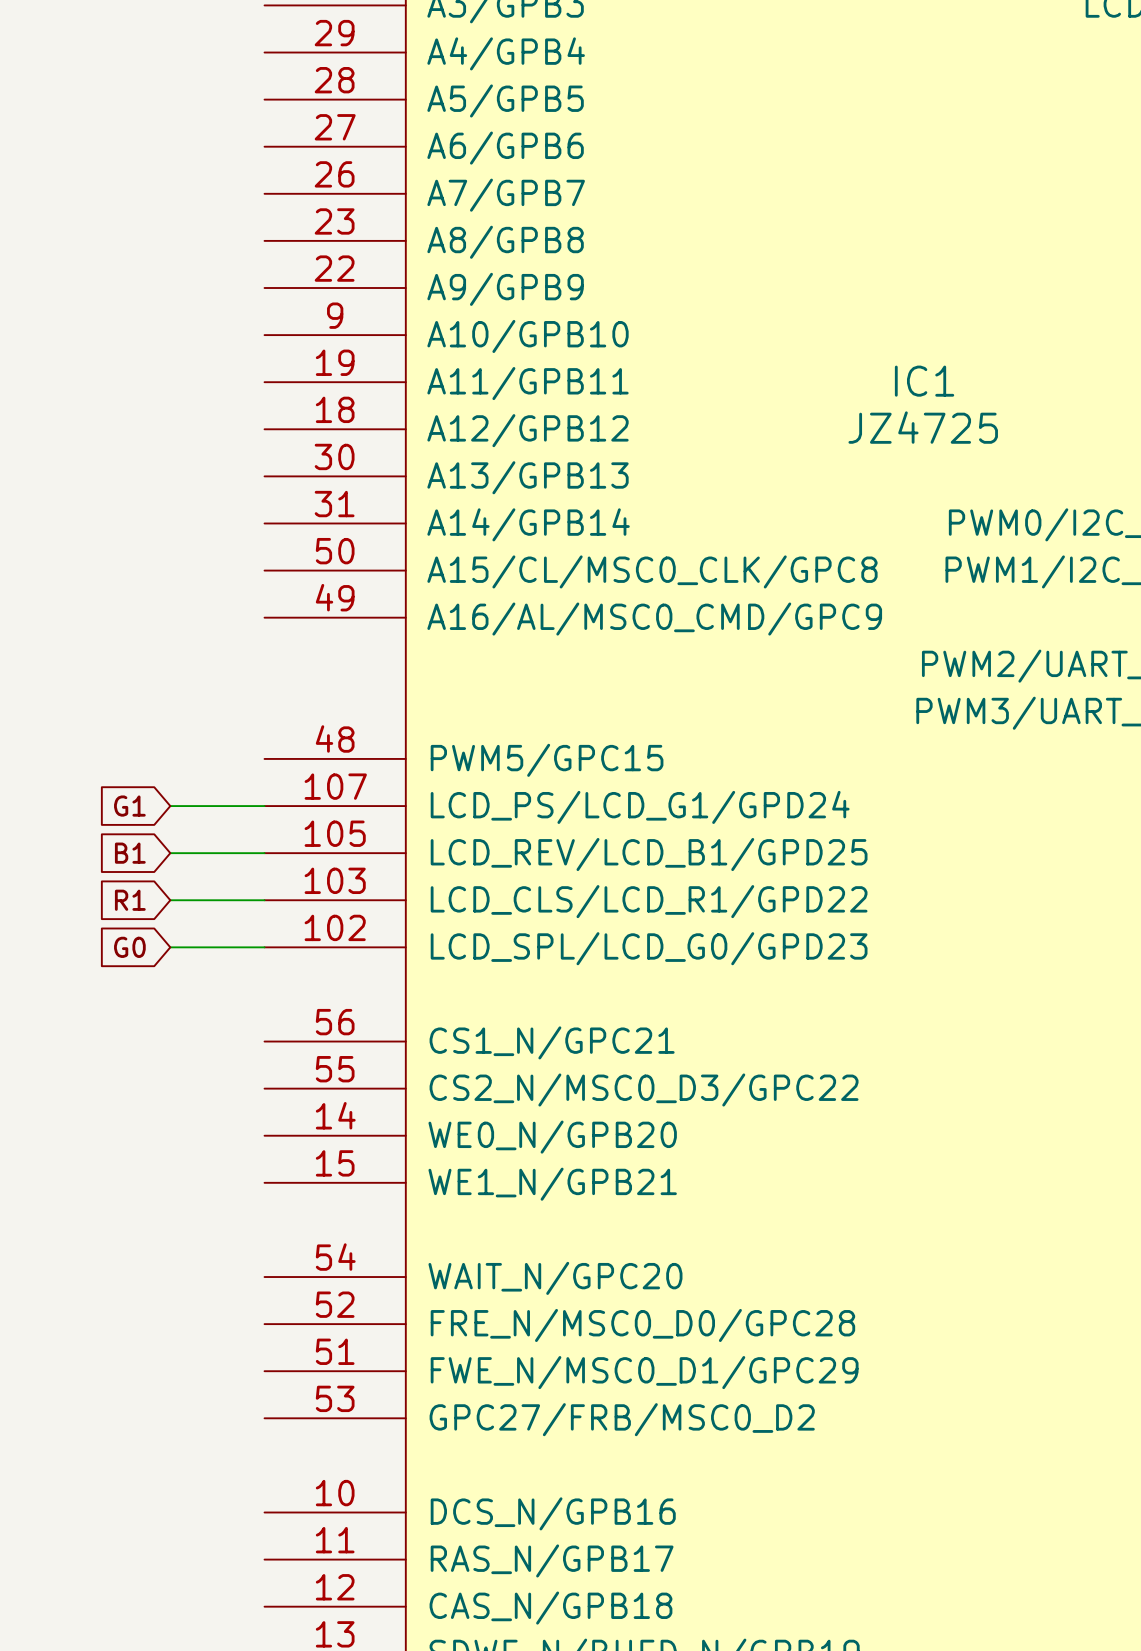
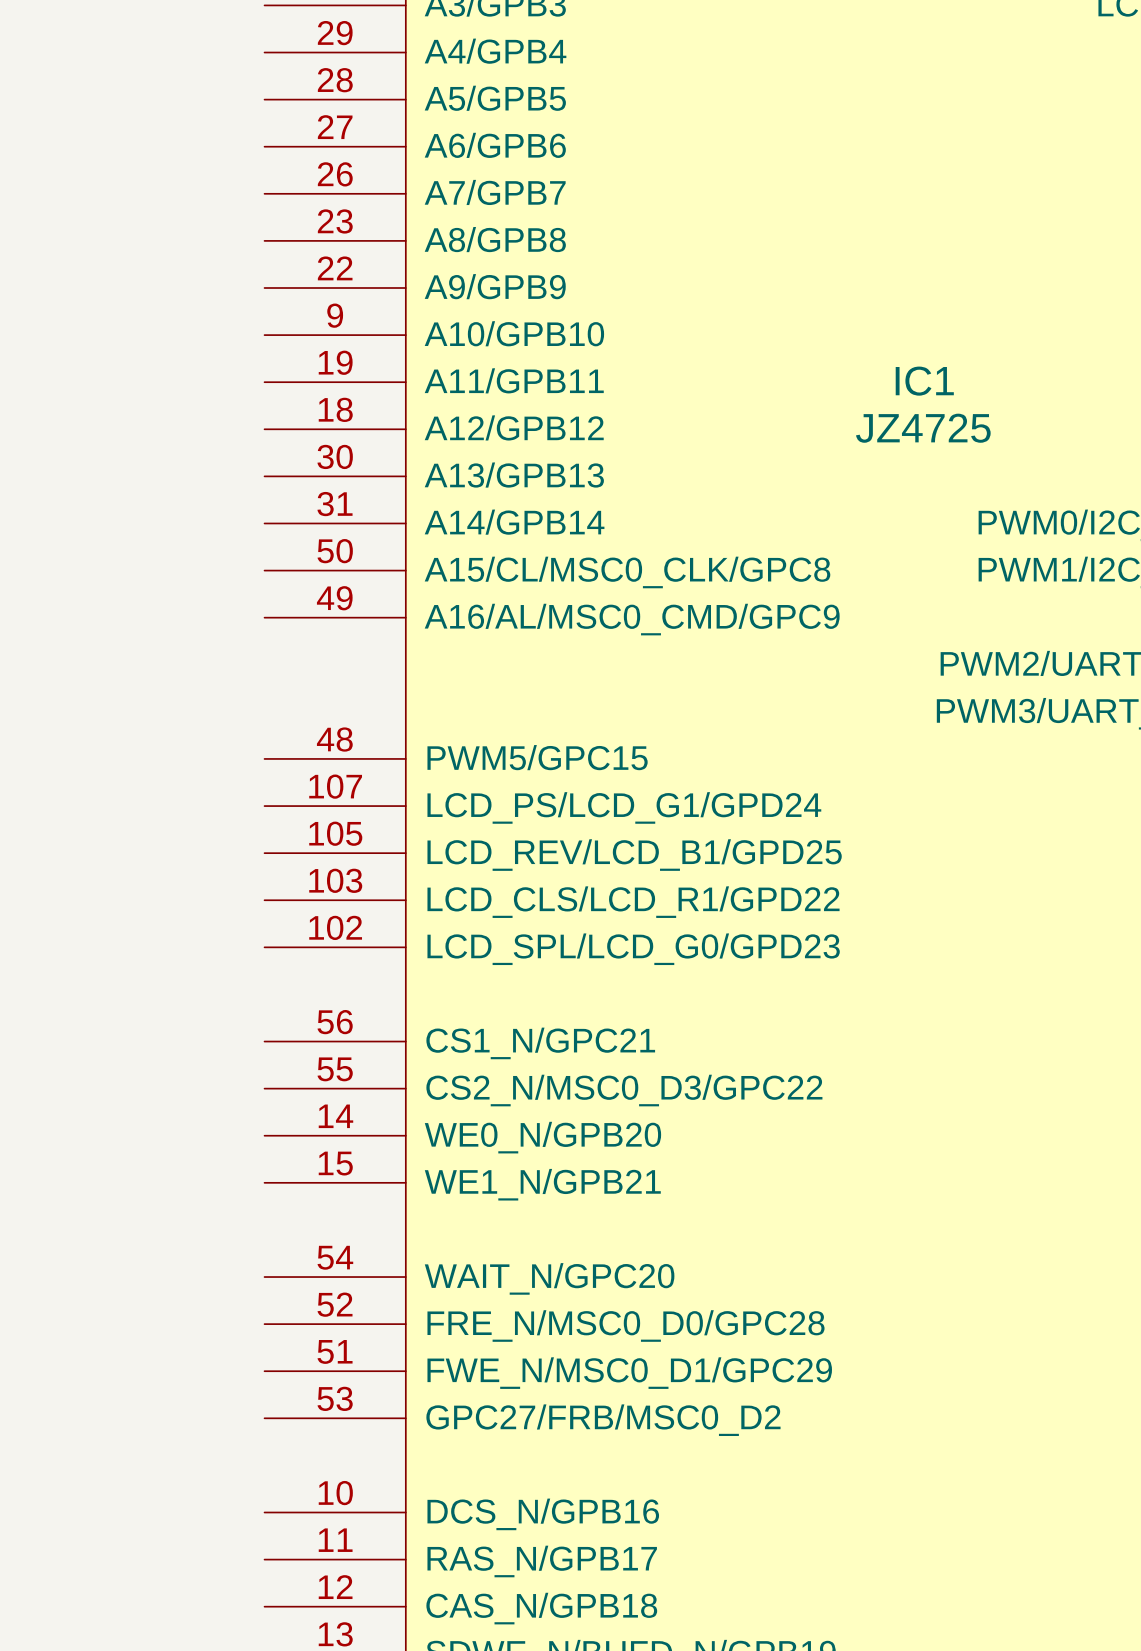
global label: G1 (129, 806) -> none
wire: (170, 806) (264, 806) -> none
global label: B1 (130, 853) -> none
wire: (170, 853) (264, 853) -> none
global label: R1 (130, 900) -> none
wire: (170, 900) (264, 900) -> none
global label: G0 (129, 947) -> none
wire: (170, 947) (264, 947) -> none

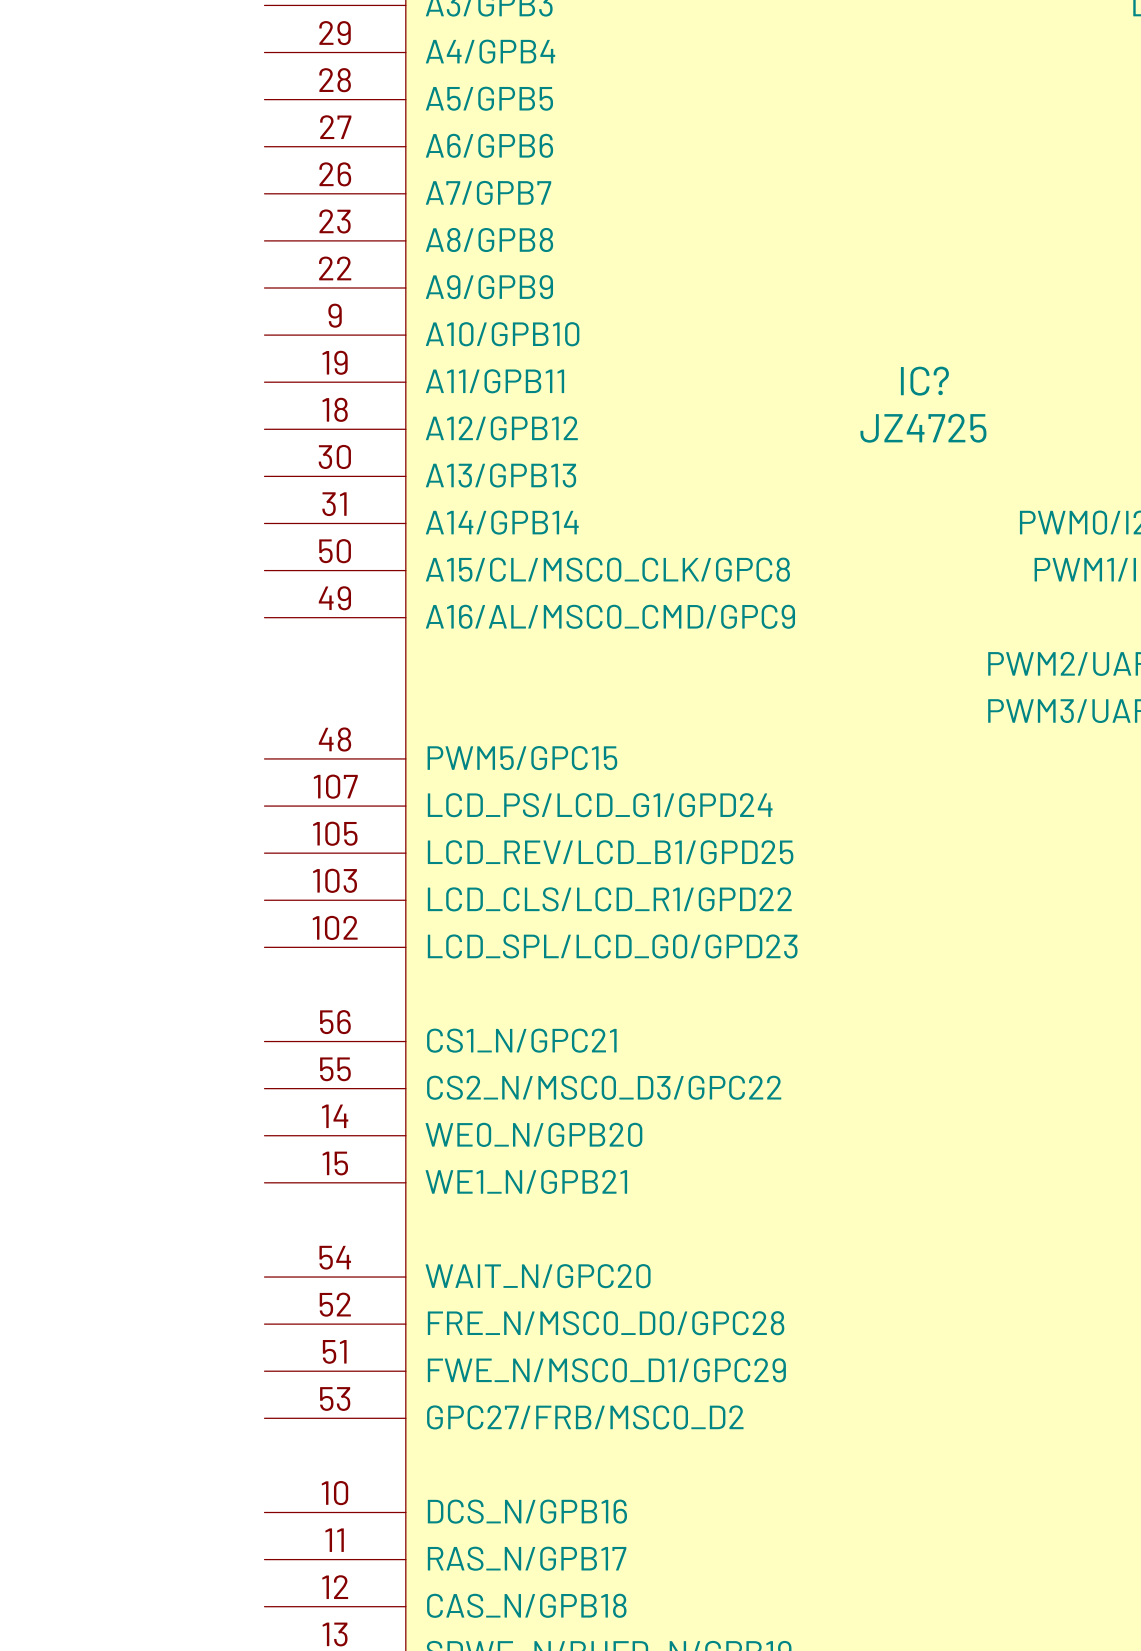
IC1 name: IC1 (924, 381) -> IC? (924, 381)

